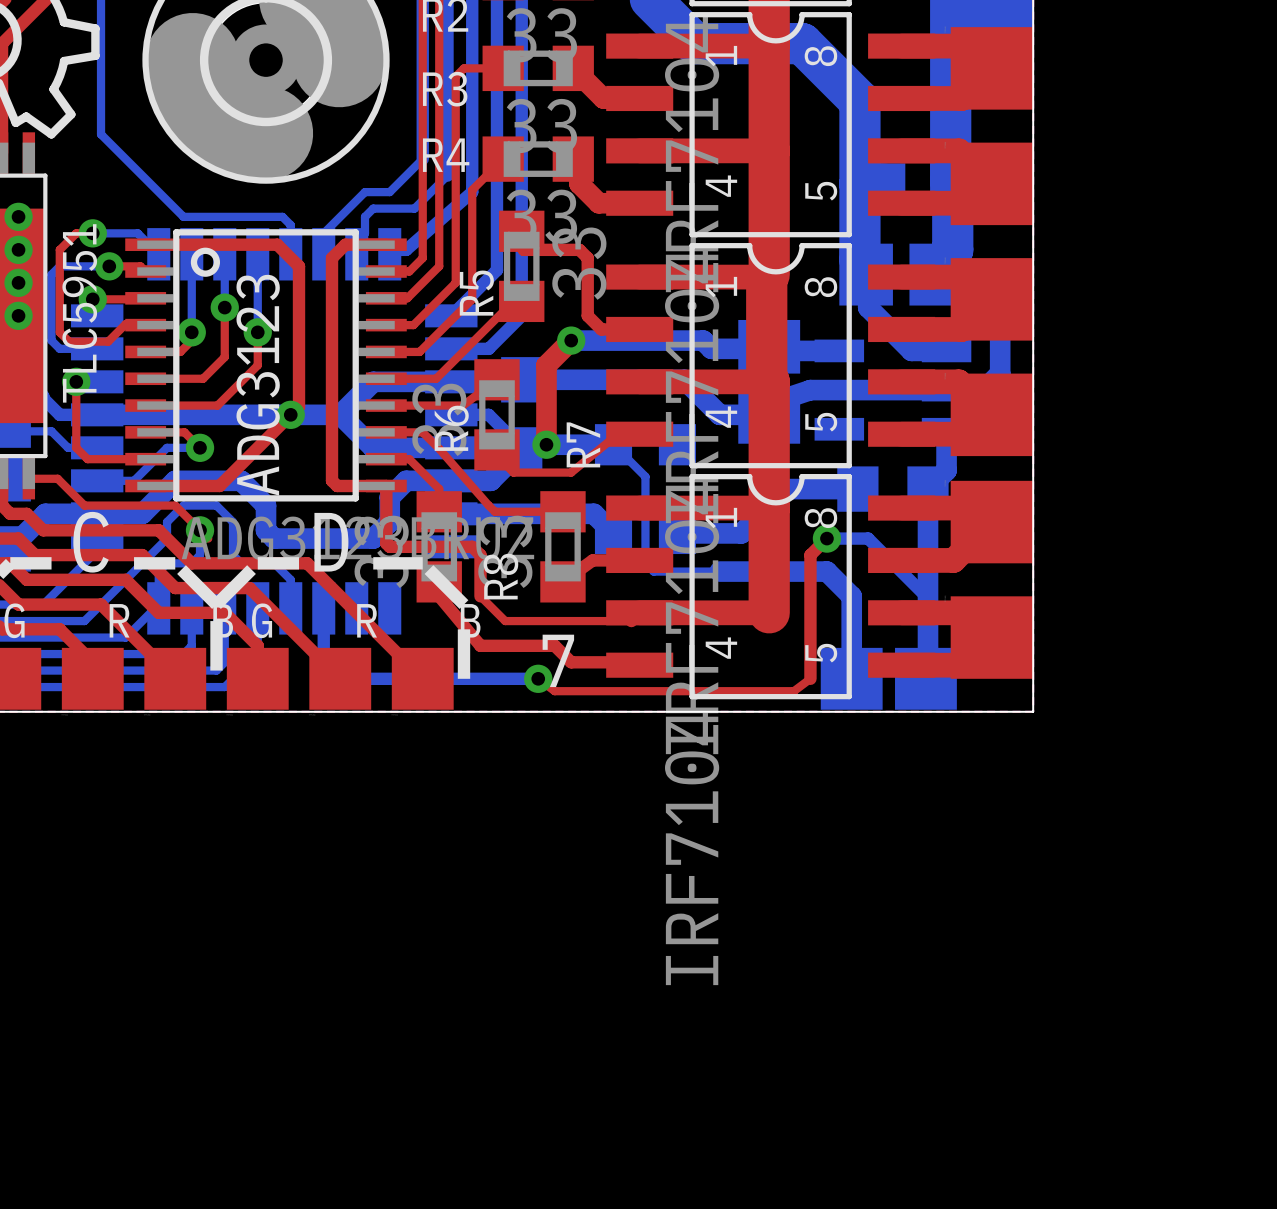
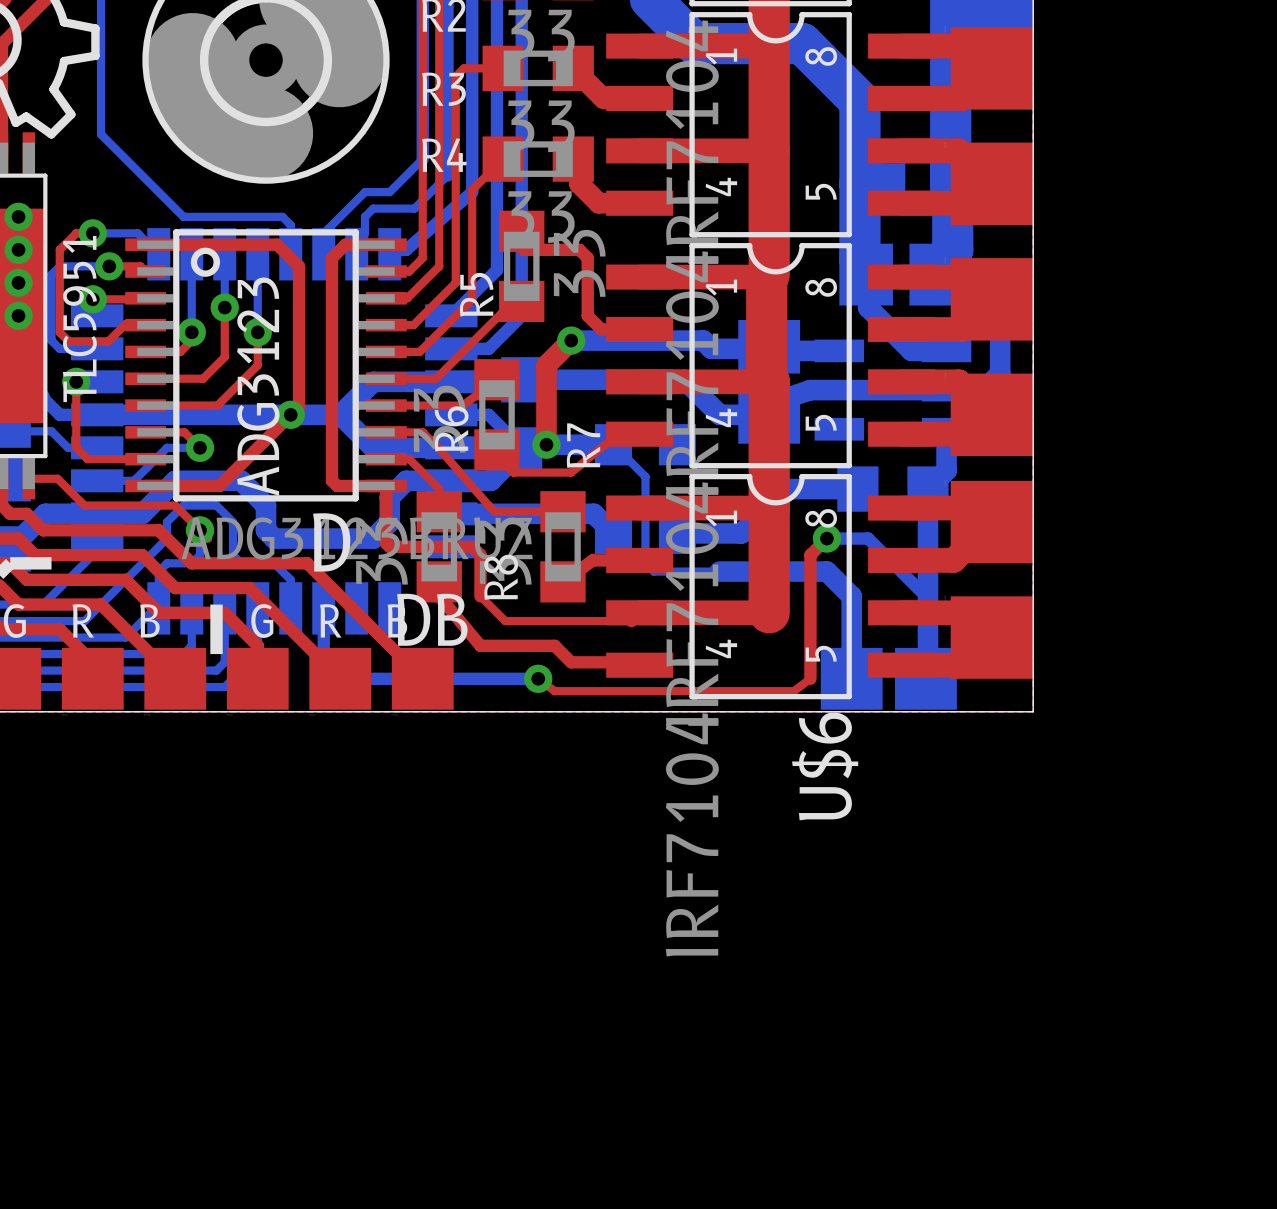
text: C (91, 542) -> none
line: (134, 563) (175, 563) (216, 604) (257, 563) (299, 563) -> none
line: (373, 563) (422, 563) (463, 604) (463, 678) -> none
DB name: none -> DB (432, 619)
text: 7 (558, 660) -> none
U$6 name: none -> U$6 (825, 766)

